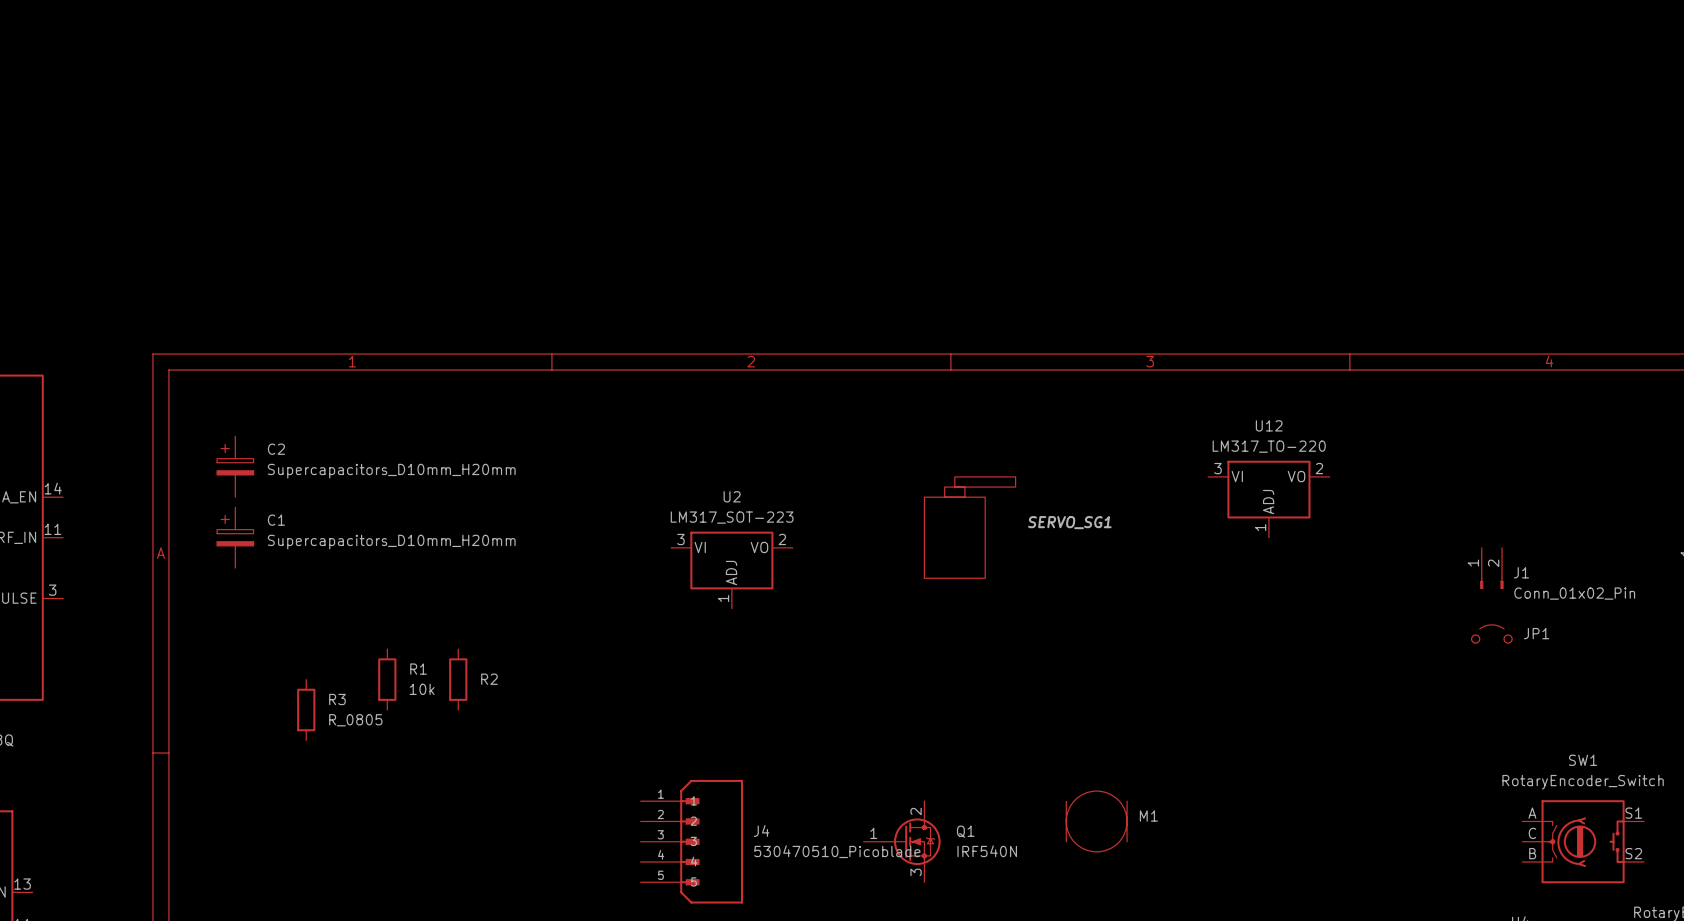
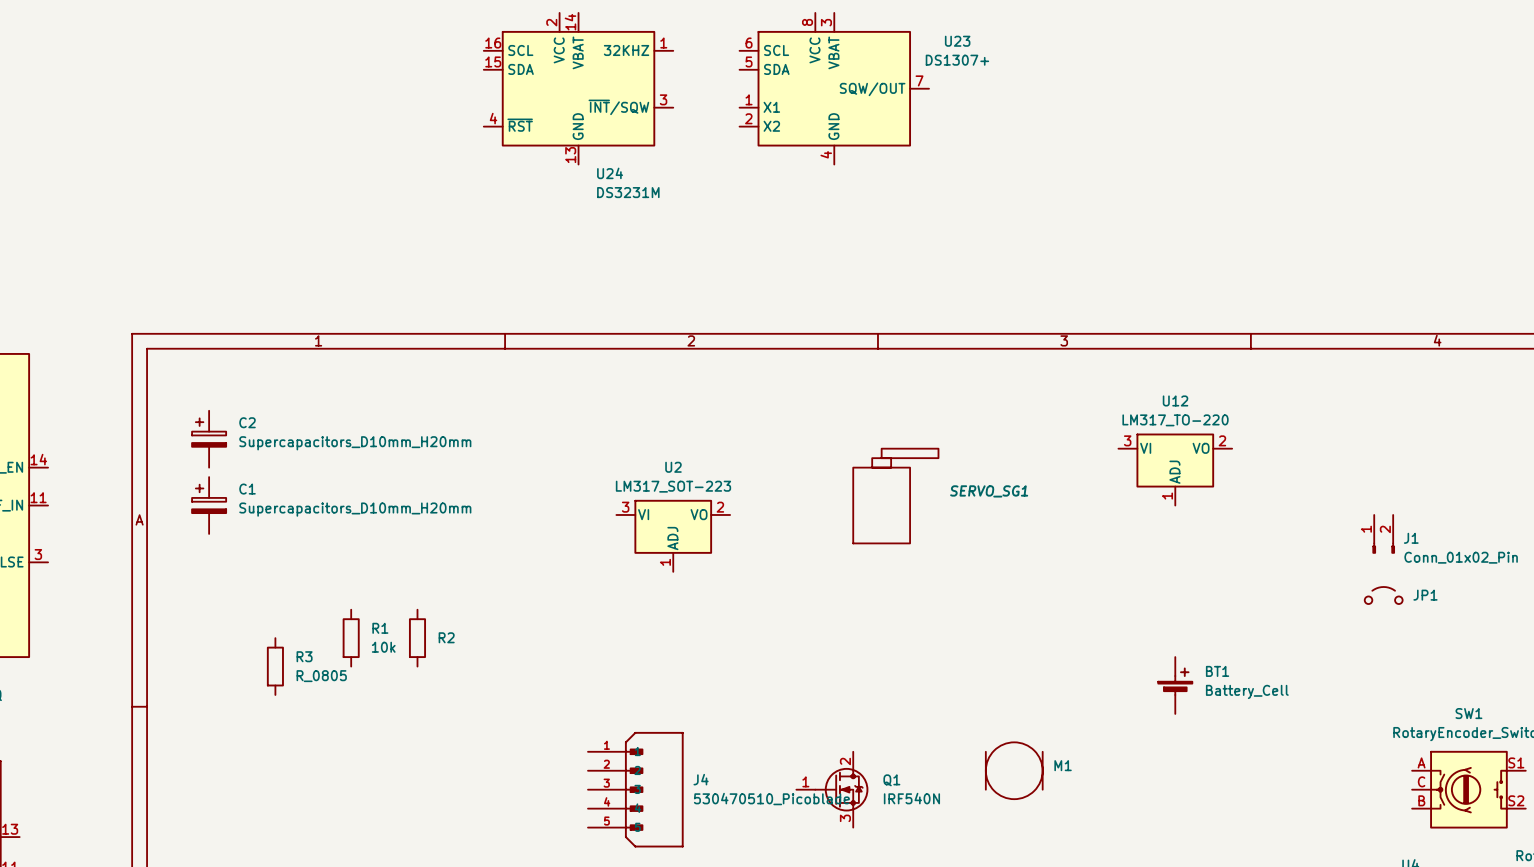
U24: none -> DS3231M (578, 88)
U23: none -> DS1307+ (834, 88)
BT1: none -> Battery_Cell (1175, 685)

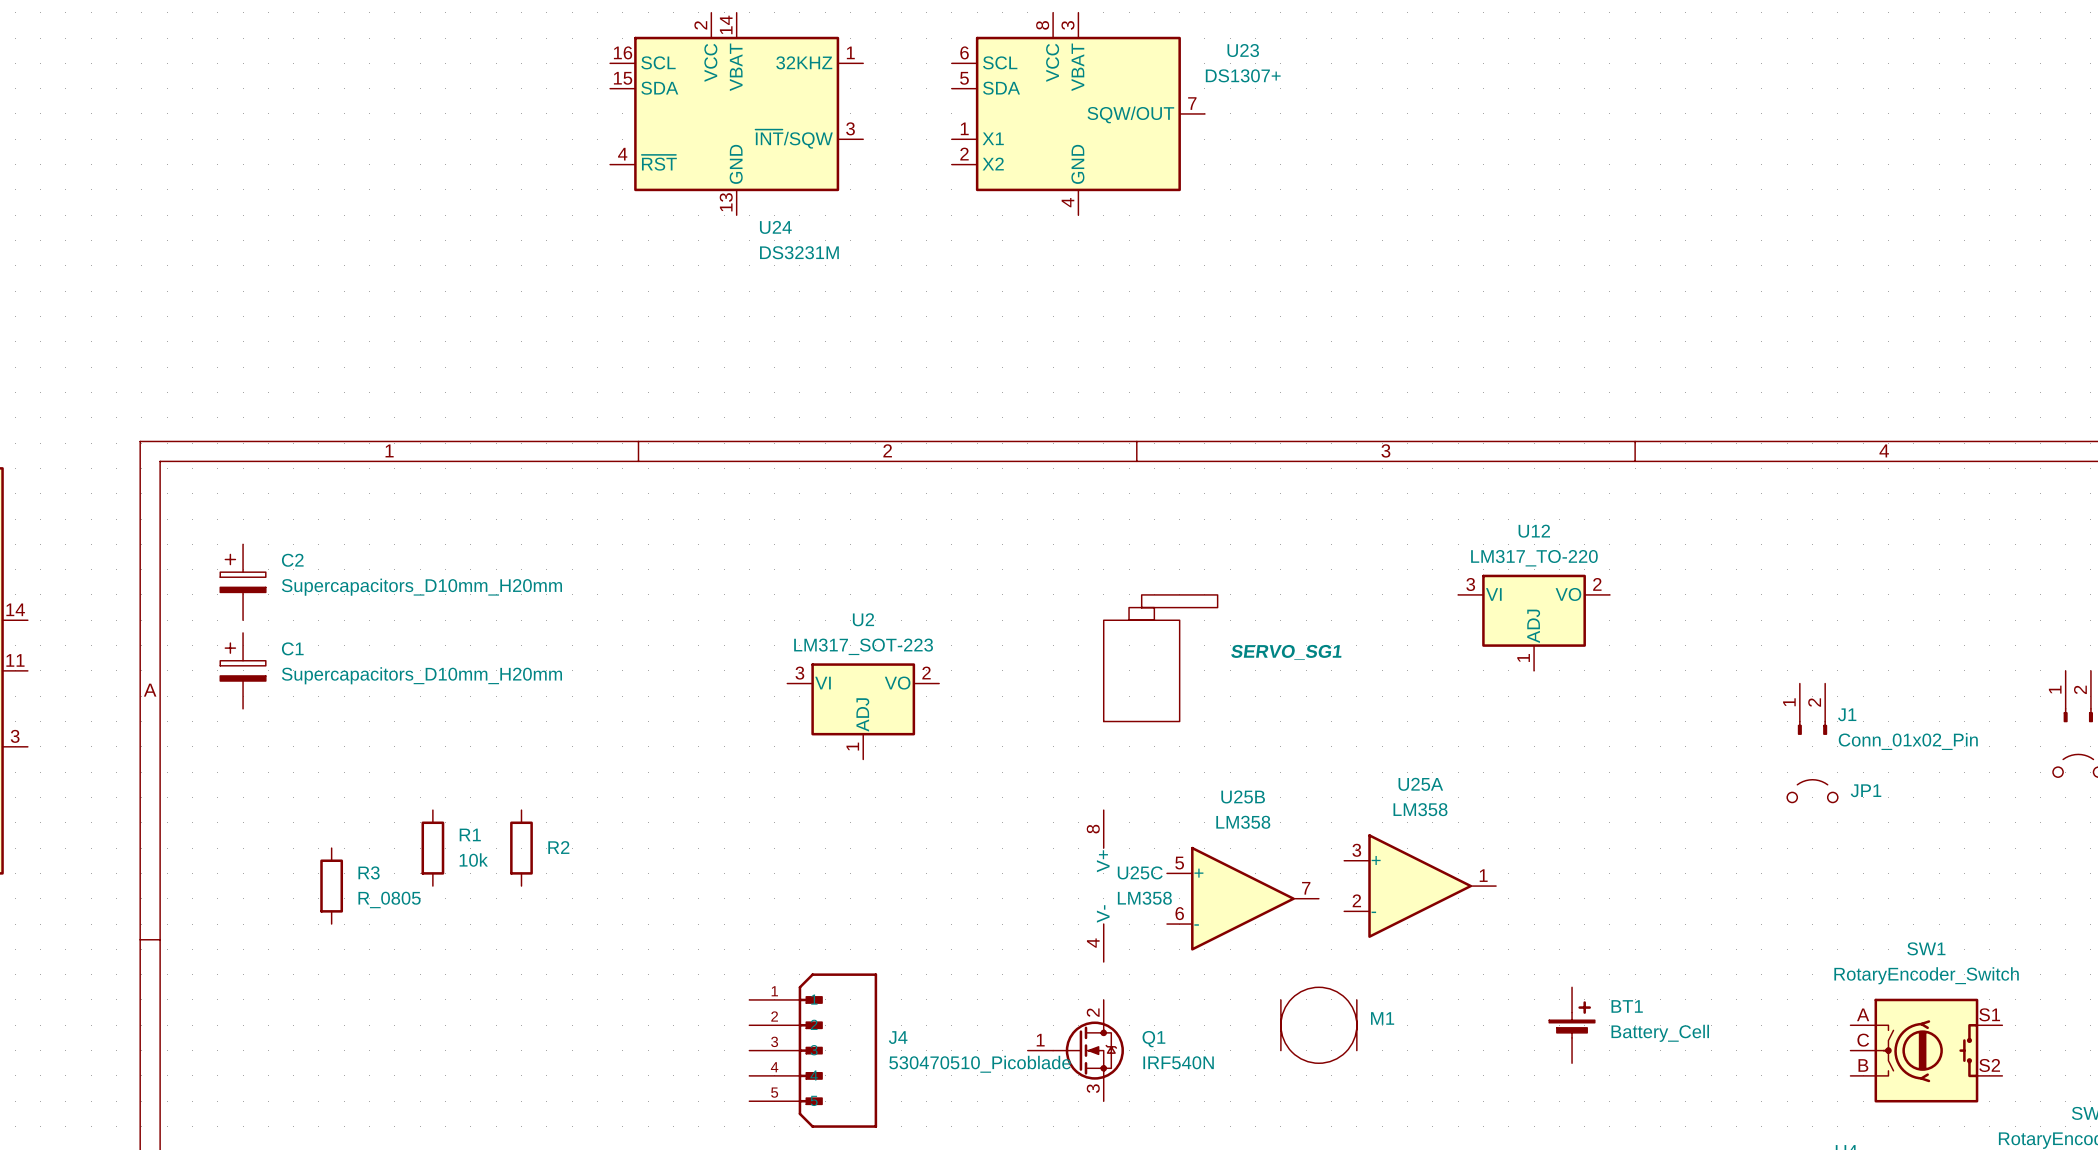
U25C: none -> LM358 (1103, 886)
U25A: none -> LM358 (1420, 886)
U25B: none -> LM358 (1242, 898)
BT1 position: (1175, 685) -> (1572, 1025)

